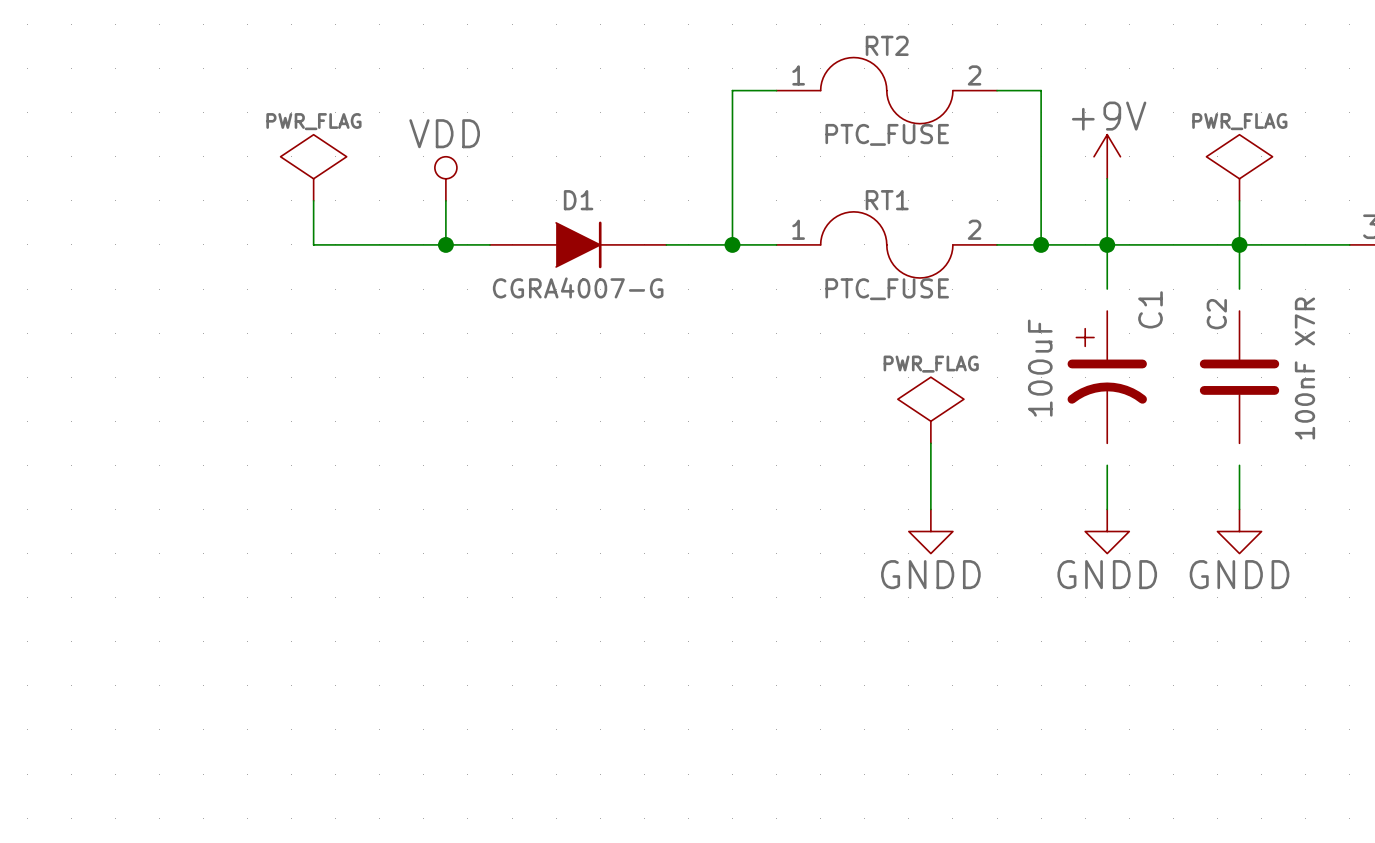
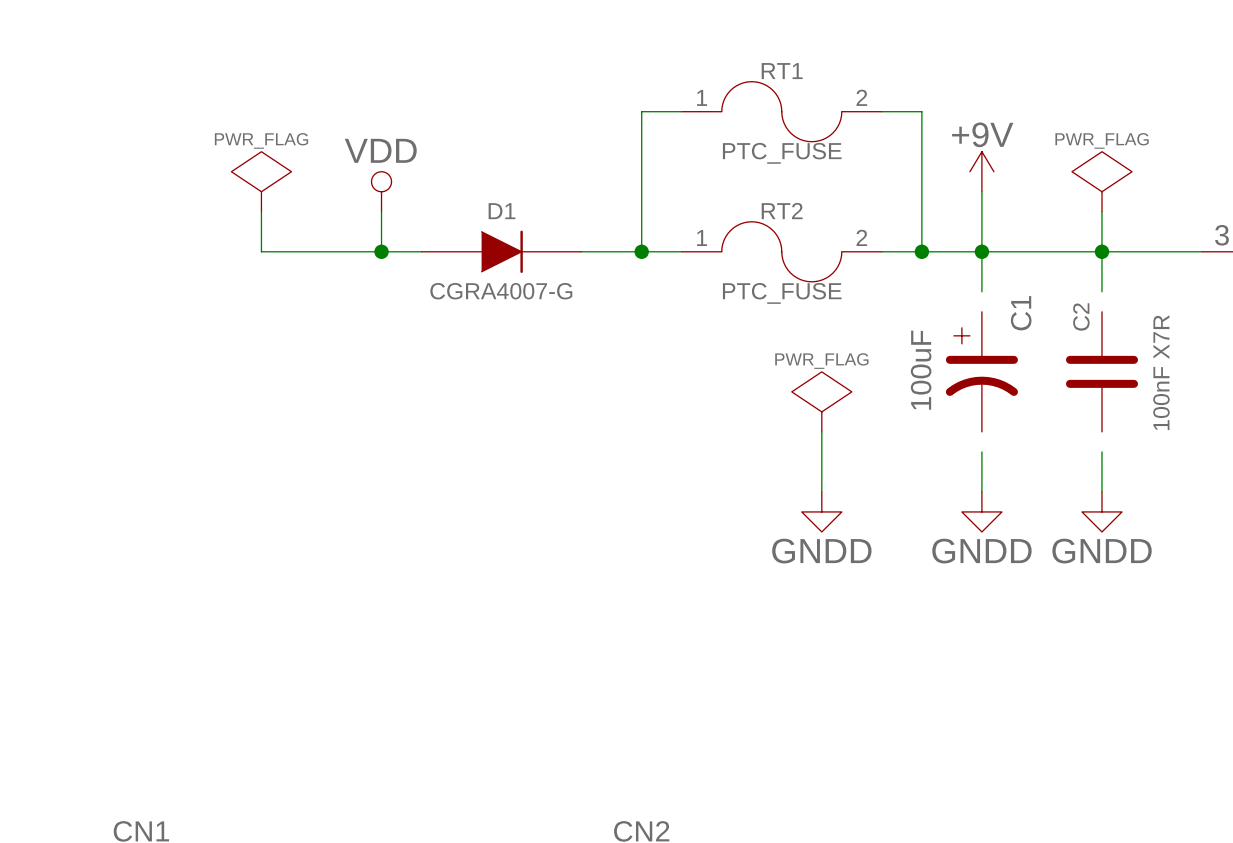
RT2 name: RT2 (887, 45) -> RT1 (782, 71)
RT1 name: RT1 (887, 200) -> RT2 (782, 211)

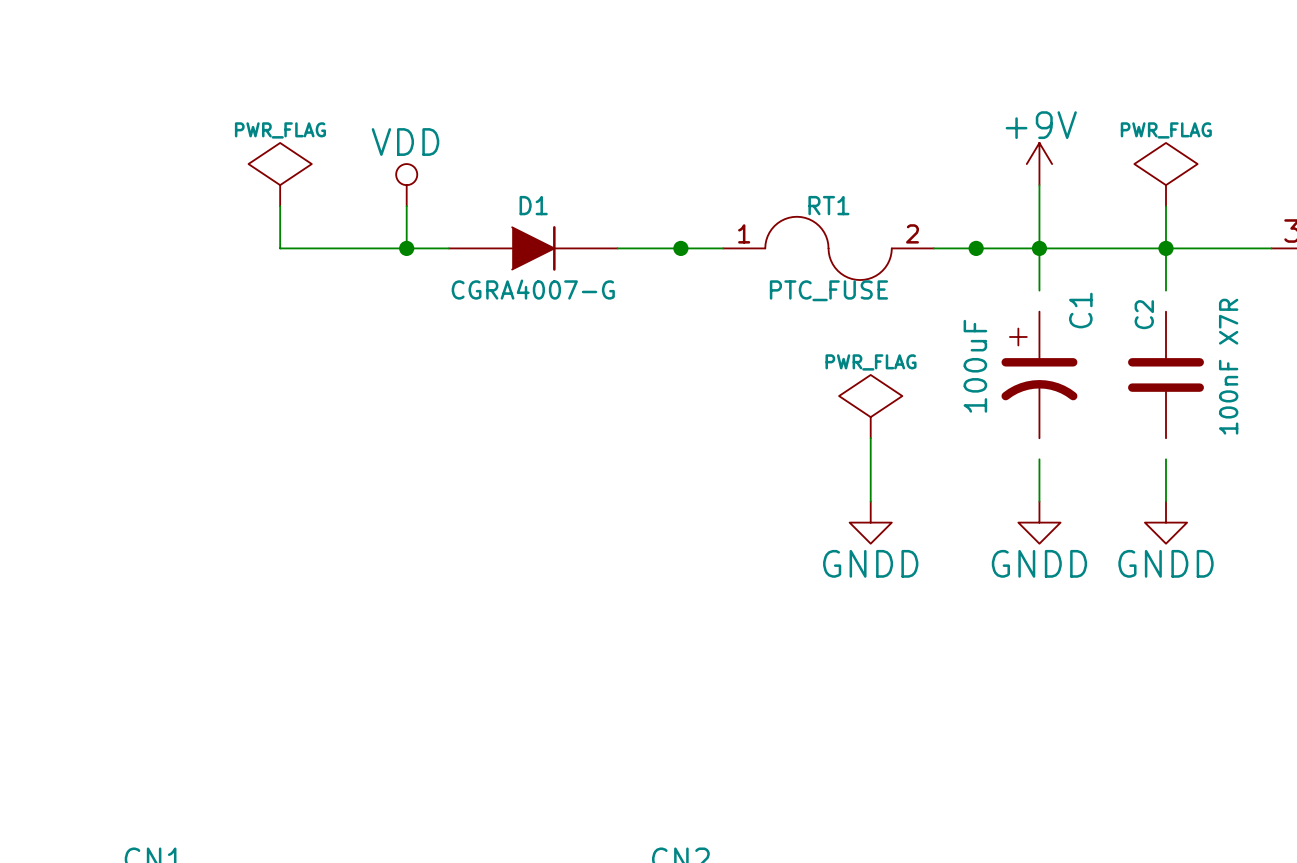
wire: (681, 111) (641, 111) (641, 251) -> none
RT1: PTC_FUSE (781, 111) -> none
wire: (881, 111) (921, 111) (921, 251) -> none
RT2 name: RT2 (782, 211) -> RT1 (828, 205)

